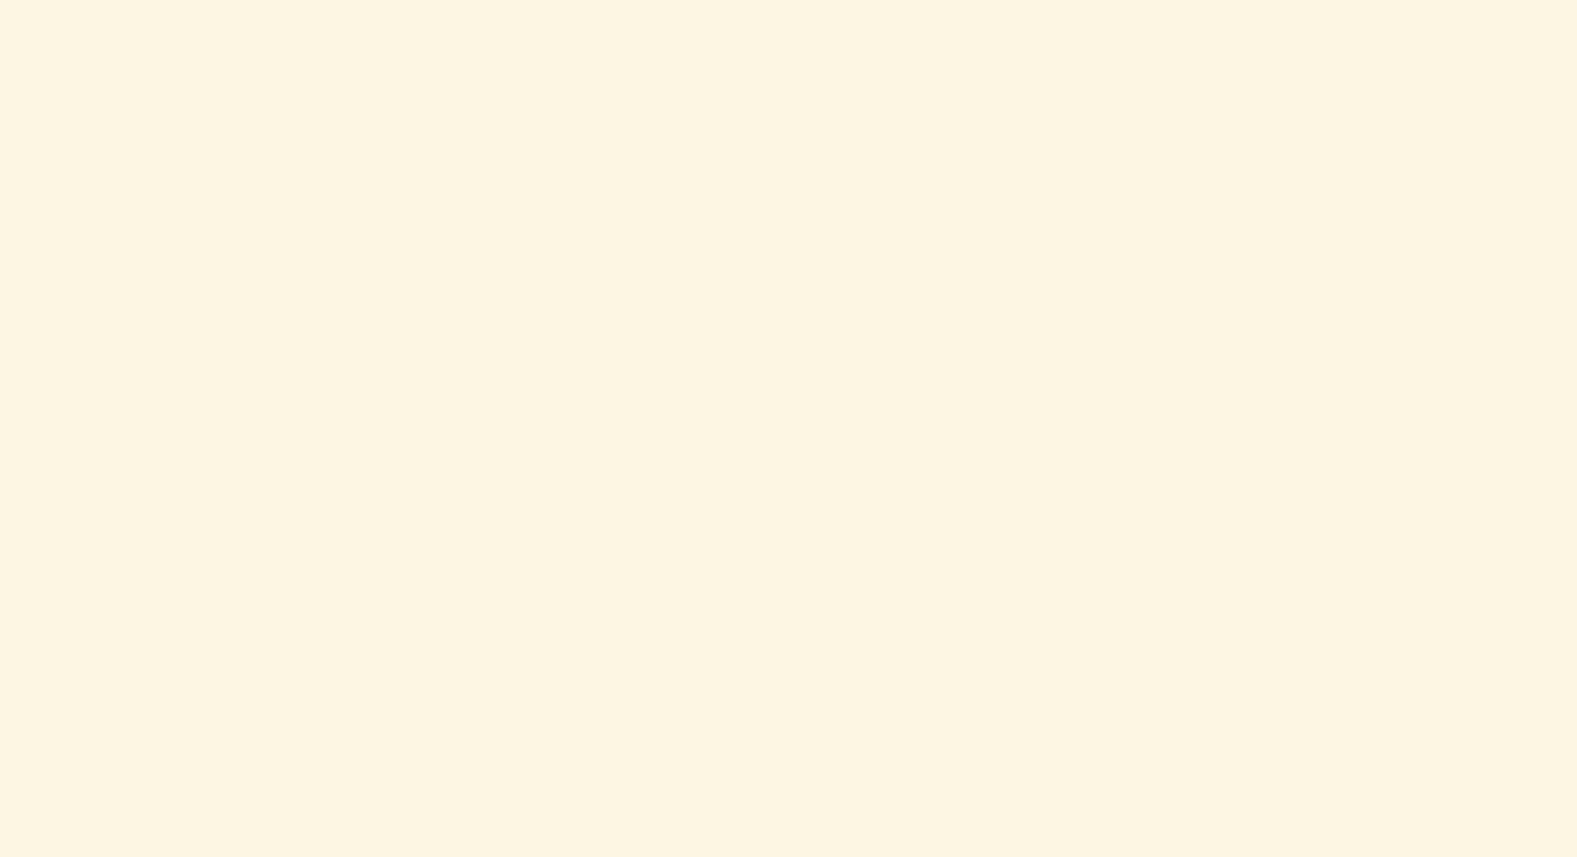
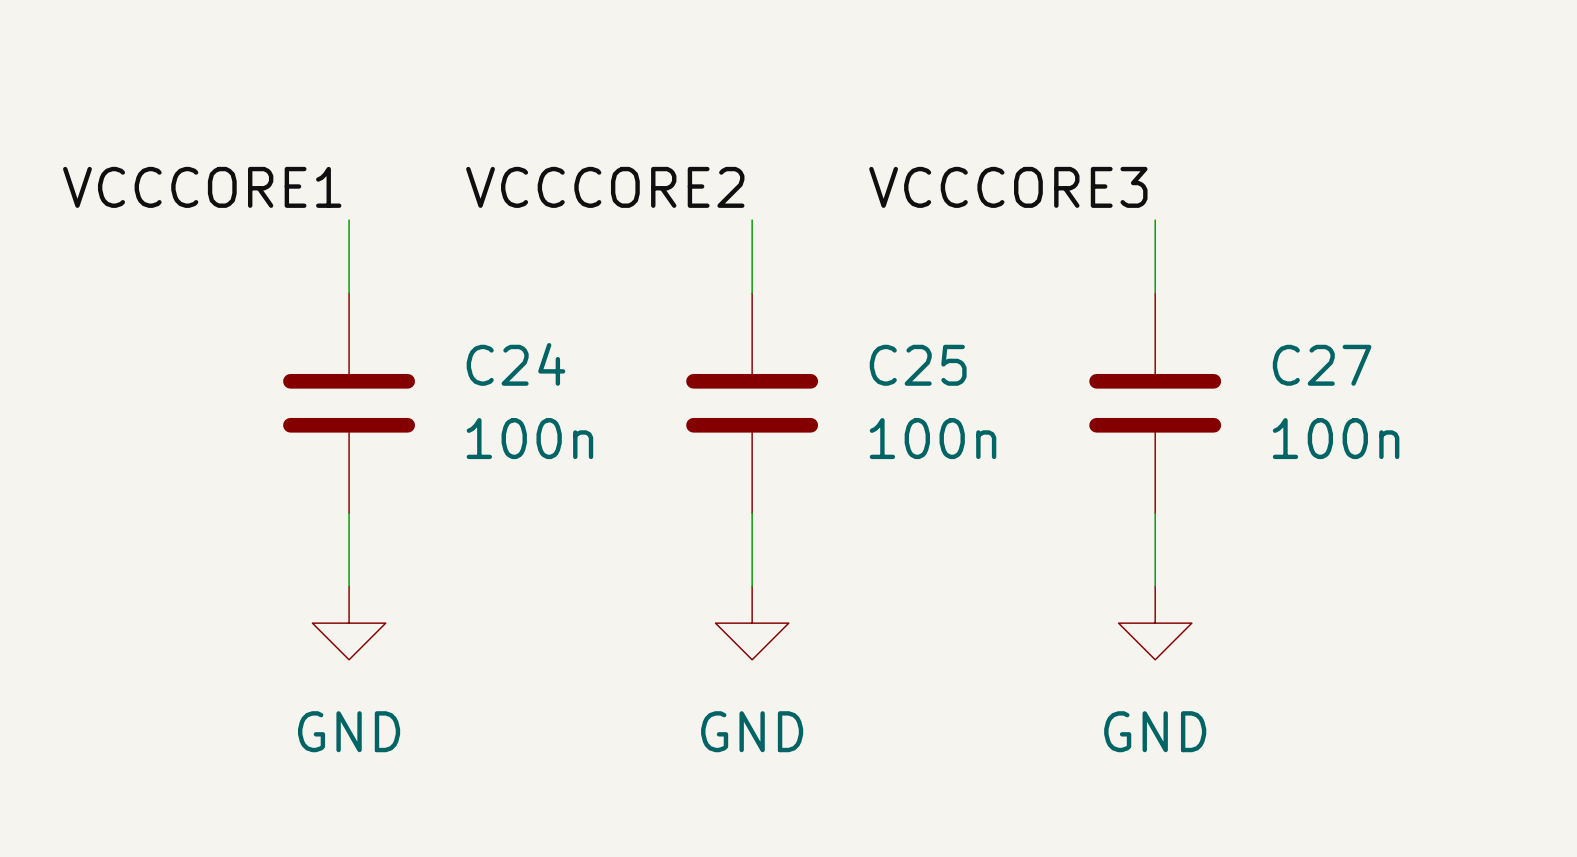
label: none -> VCCCORE1 (202, 187)
label: none -> VCCCORE2 (605, 187)
label: none -> VCCCORE3 (1008, 187)
wire: none -> (349, 220) (349, 293)
wire: none -> (752, 220) (752, 293)
wire: none -> (1155, 220) (1155, 293)
C24: none -> 100n (349, 403)
C25: none -> 100n (752, 403)
C27: none -> 100n (1155, 403)
wire: none -> (349, 513) (349, 586)
wire: none -> (752, 513) (752, 586)
wire: none -> (1155, 513) (1155, 586)
power symbol: none -> GND (349, 623)
power symbol: none -> GND (752, 623)
power symbol: none -> GND (1155, 623)

